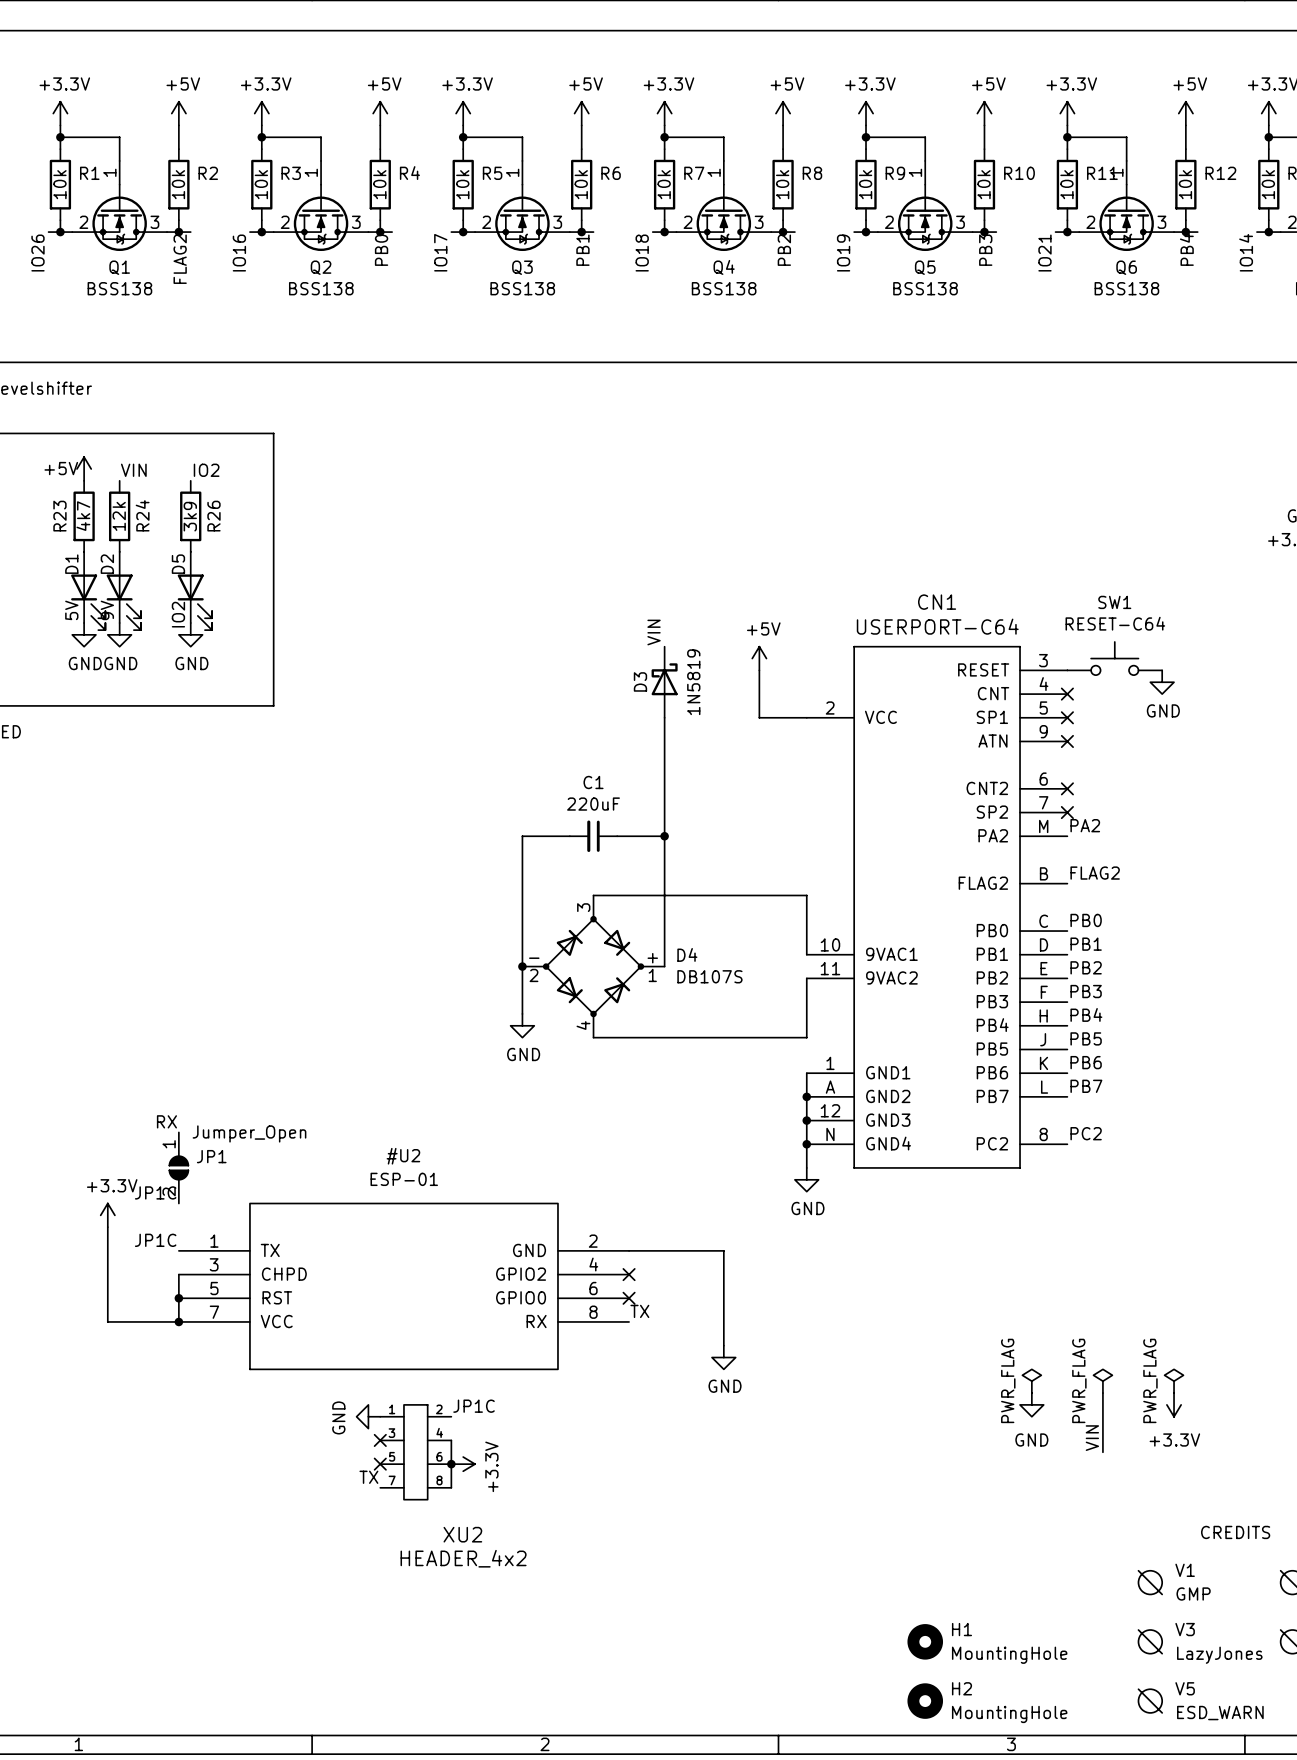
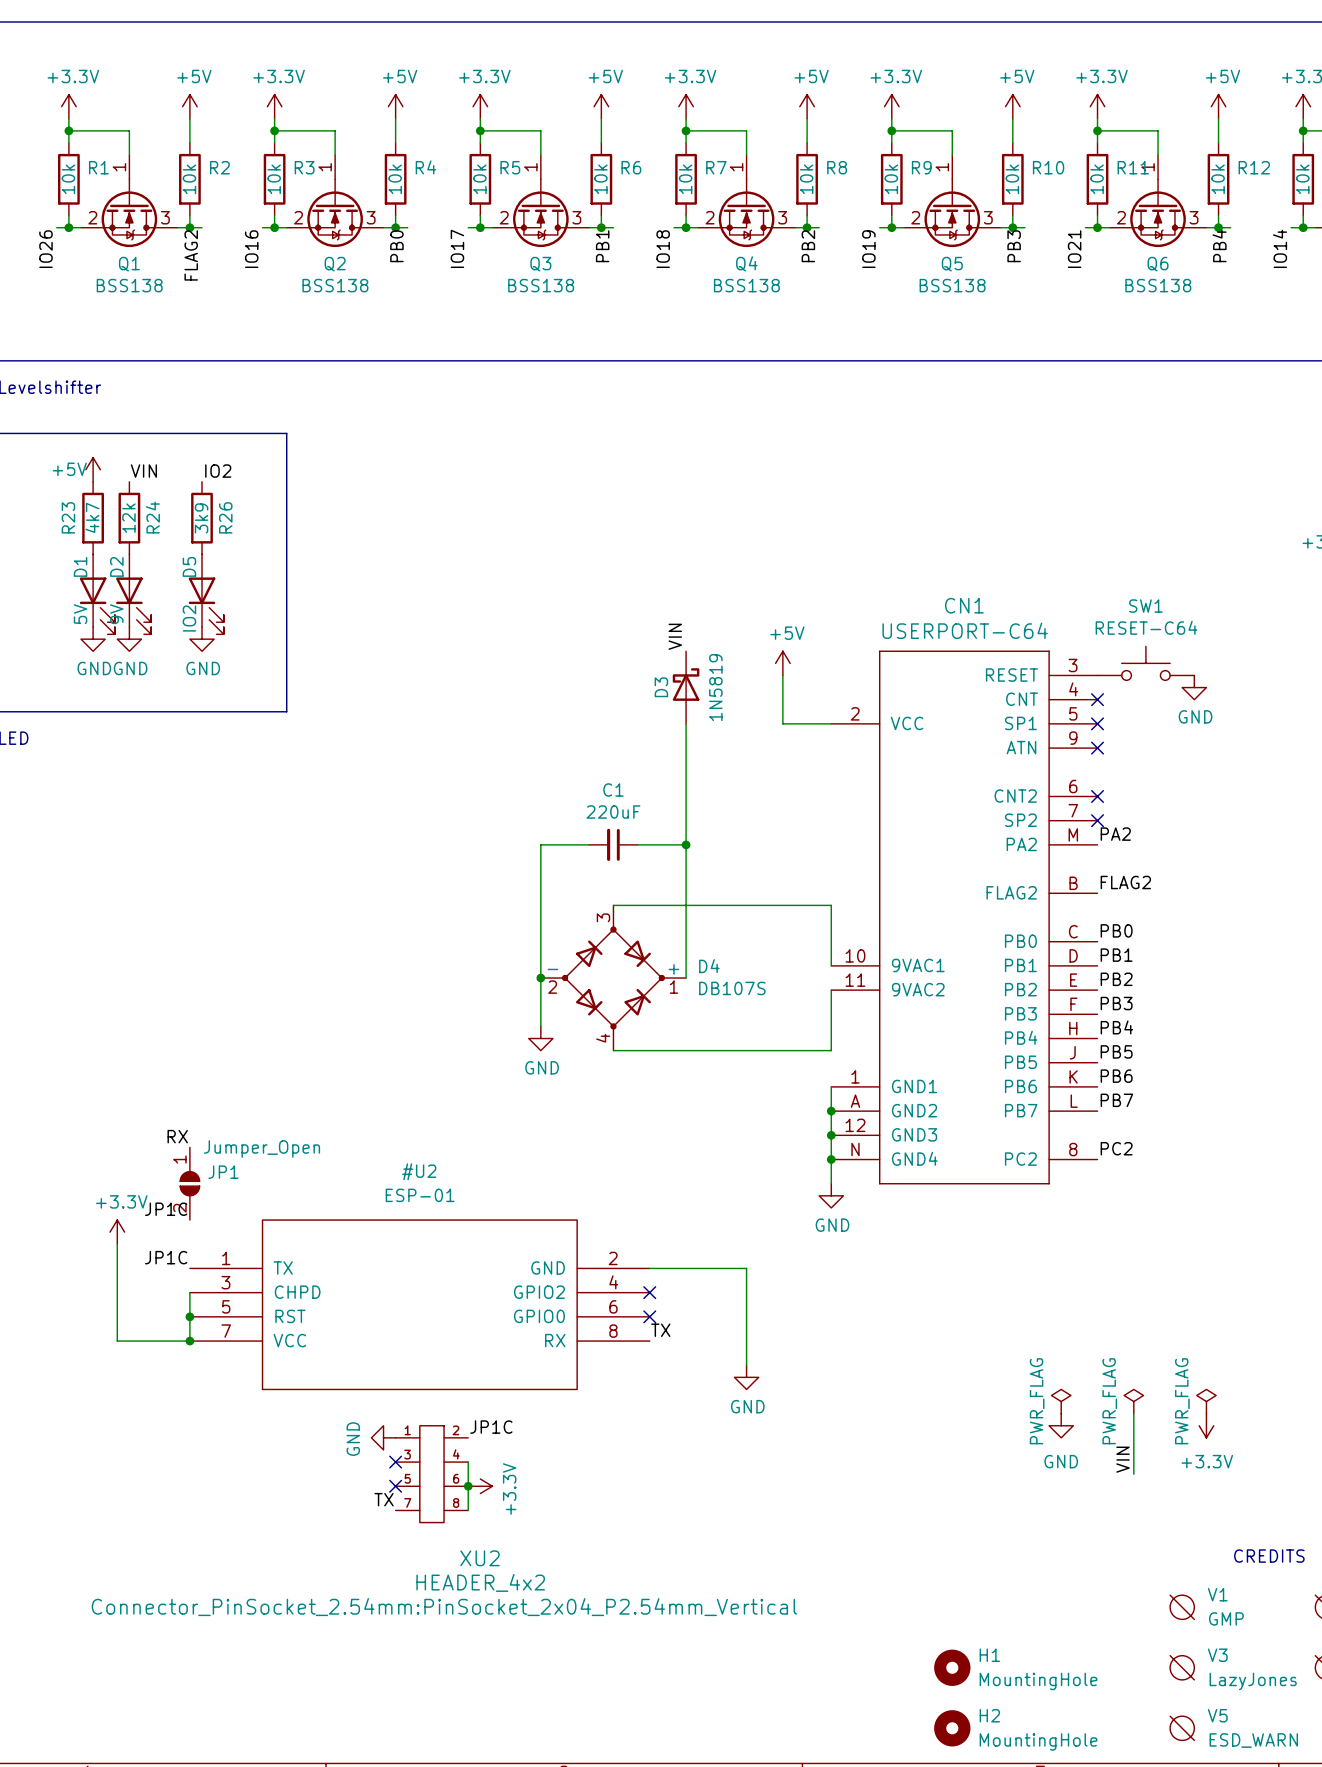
XU2 text: none -> Connector_PinSocket_2.54mm:PinSocket_2x04_P2.54mm_Vertical (444, 1607)

